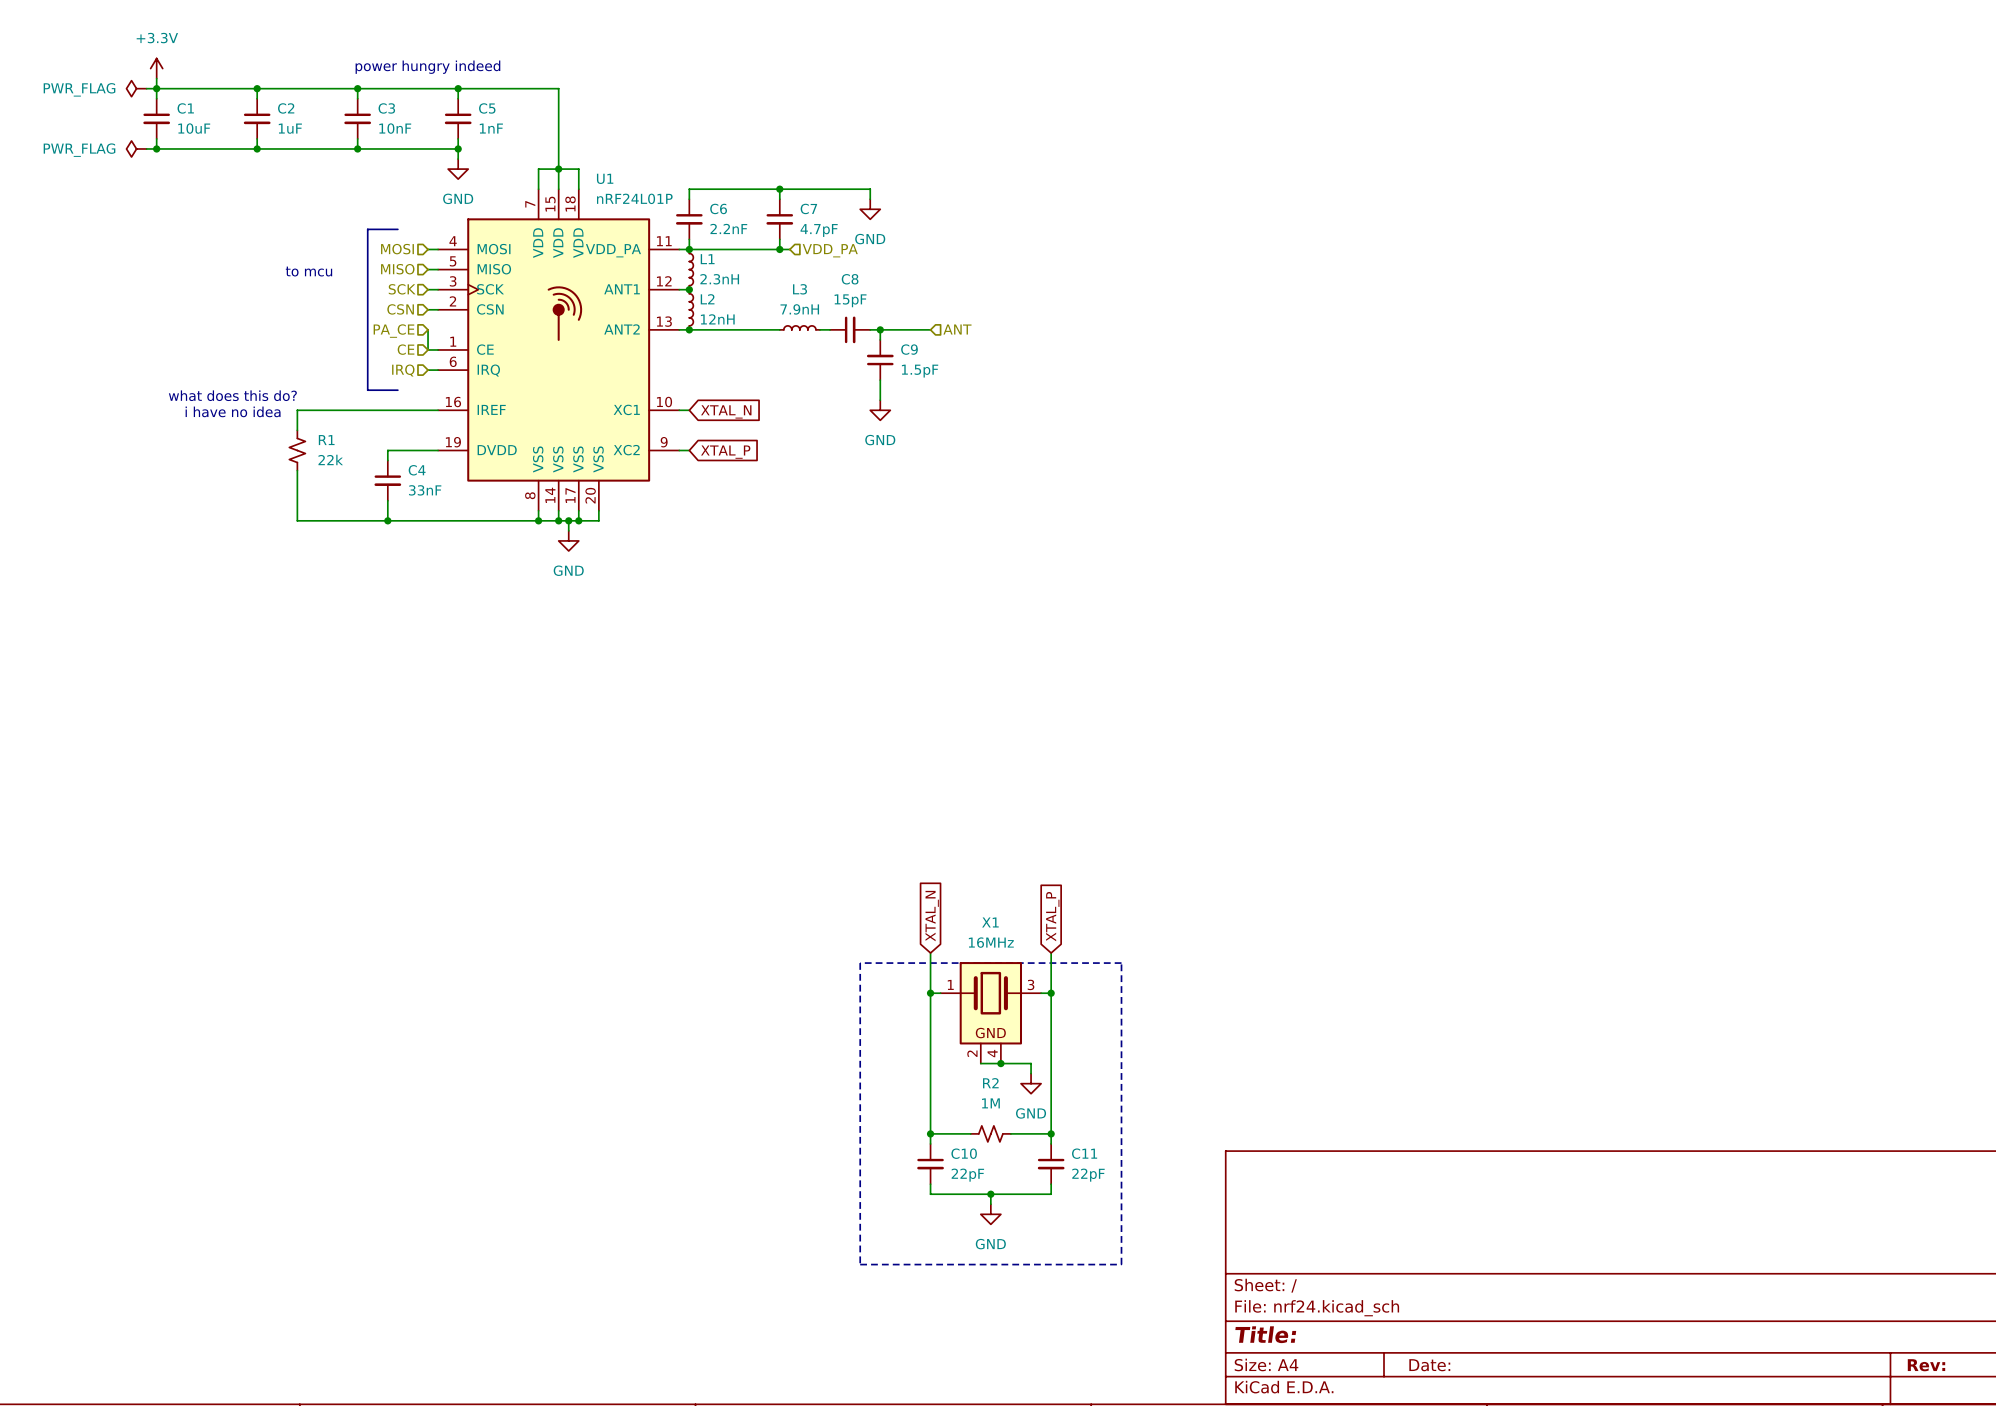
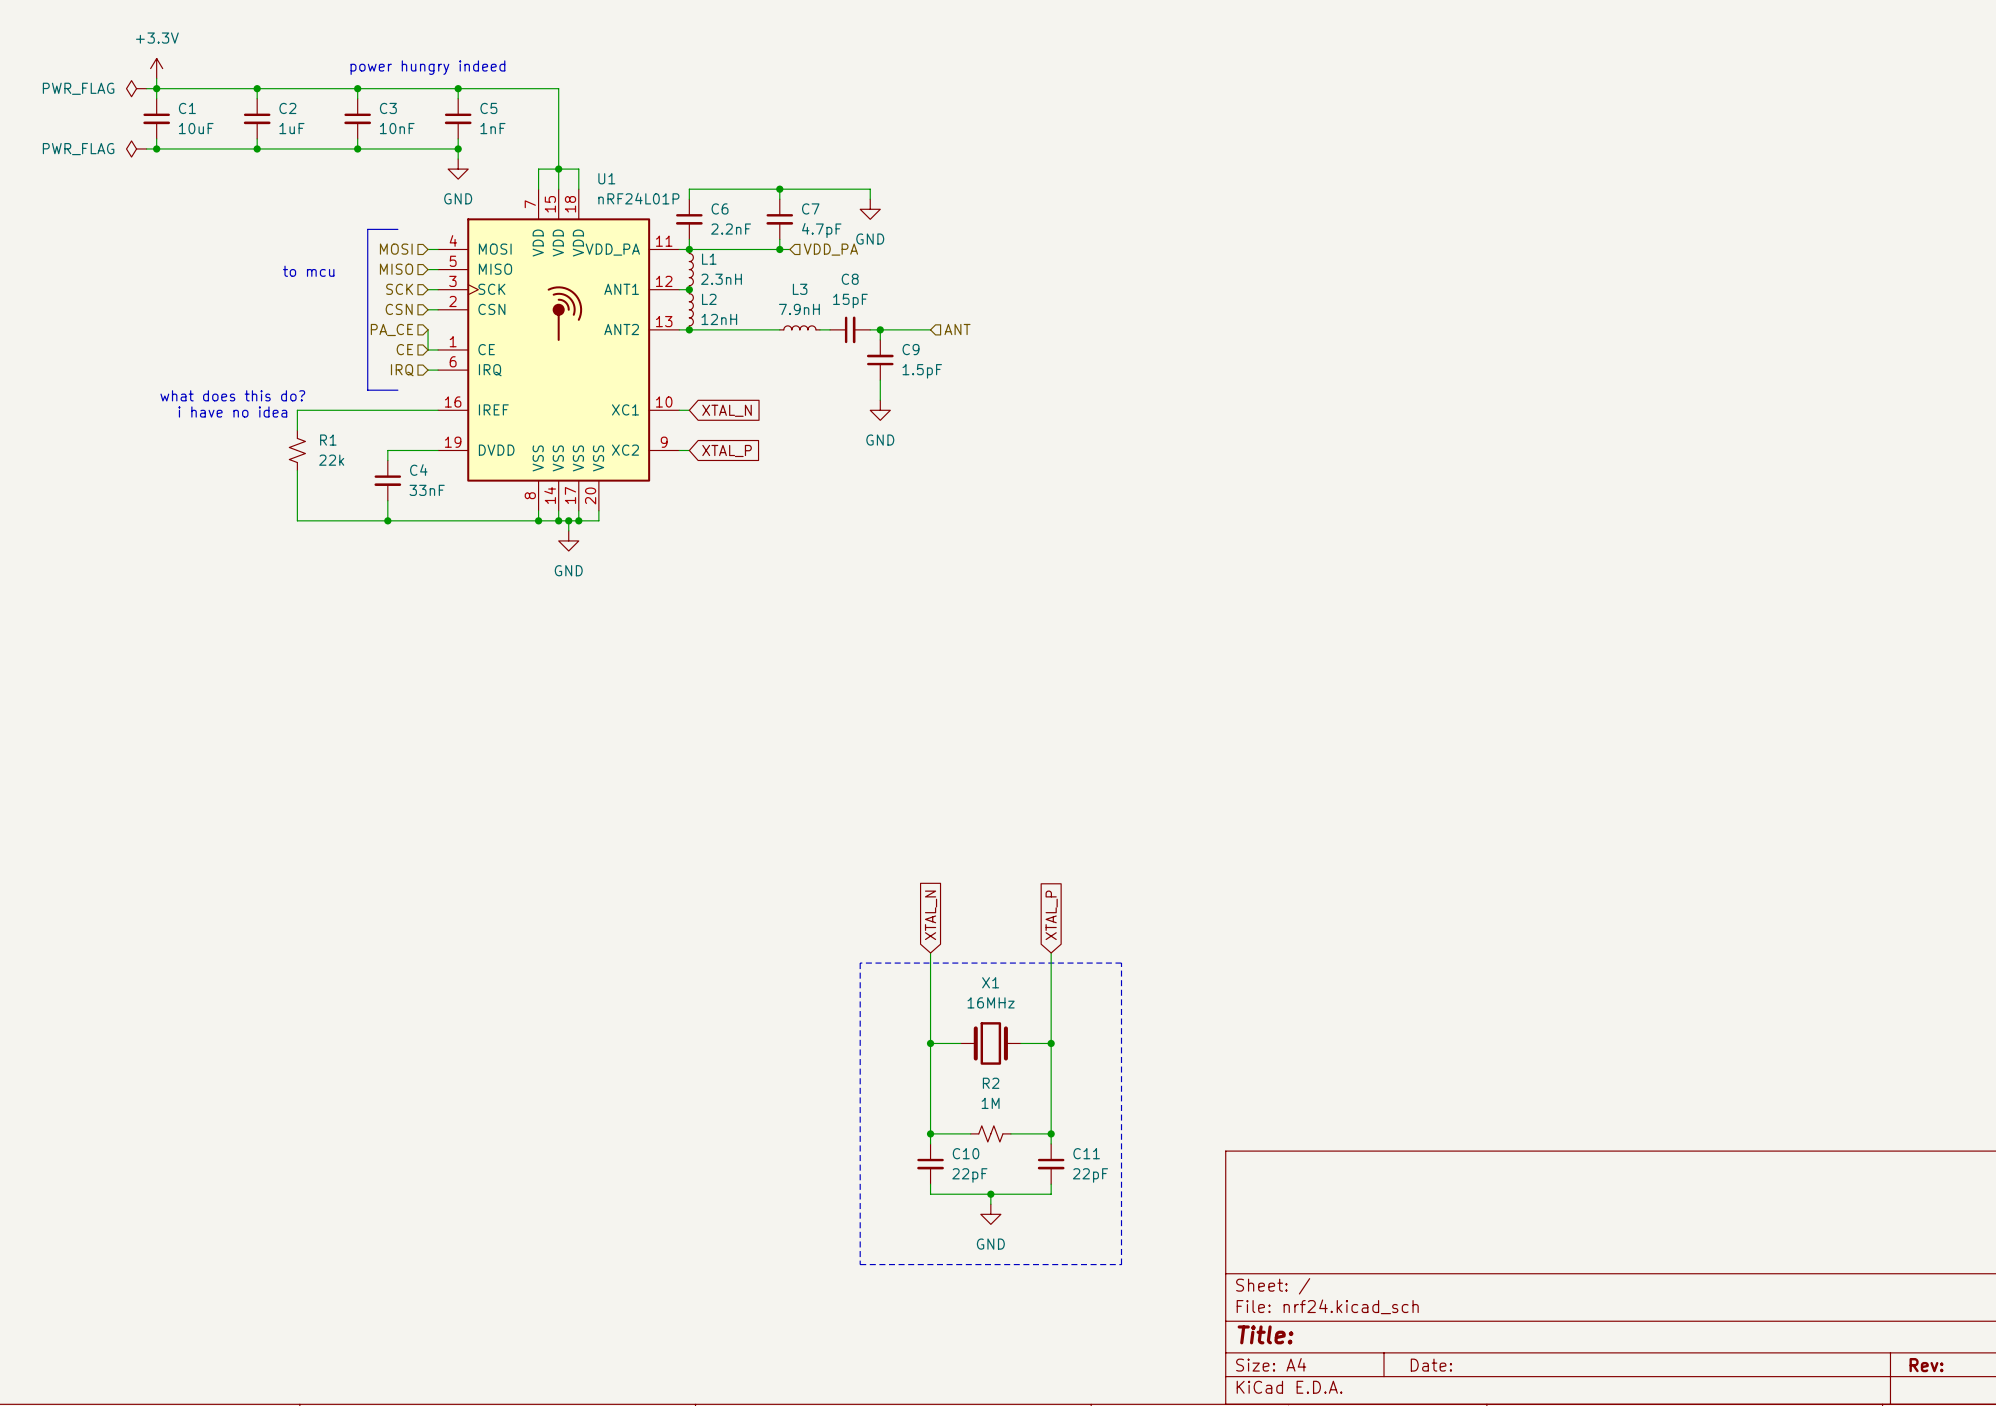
X1 name position: X1 (990, 922) -> X1 (990, 982)
X1 value position: 16MHz (991, 942) -> 16MHz (991, 1002)
X1 symbol: [940, 962, 1042, 1064] -> [960, 1022, 1022, 1065]
wire: (930, 993) (940, 993) -> none
junction: (930, 993) -> none
wire: (1041, 993) (1051, 993) -> none
junction: (1051, 993) -> none
wire: none -> (930, 1043) (960, 1043)
junction: none -> (930, 1043)
wire: none -> (1021, 1043) (1051, 1043)
junction: none -> (1051, 1043)
wire: (980, 1063) (1031, 1063) (1031, 1073) -> none
junction: (1000, 1063) -> none
power symbol: GND (1031, 1083) -> none

